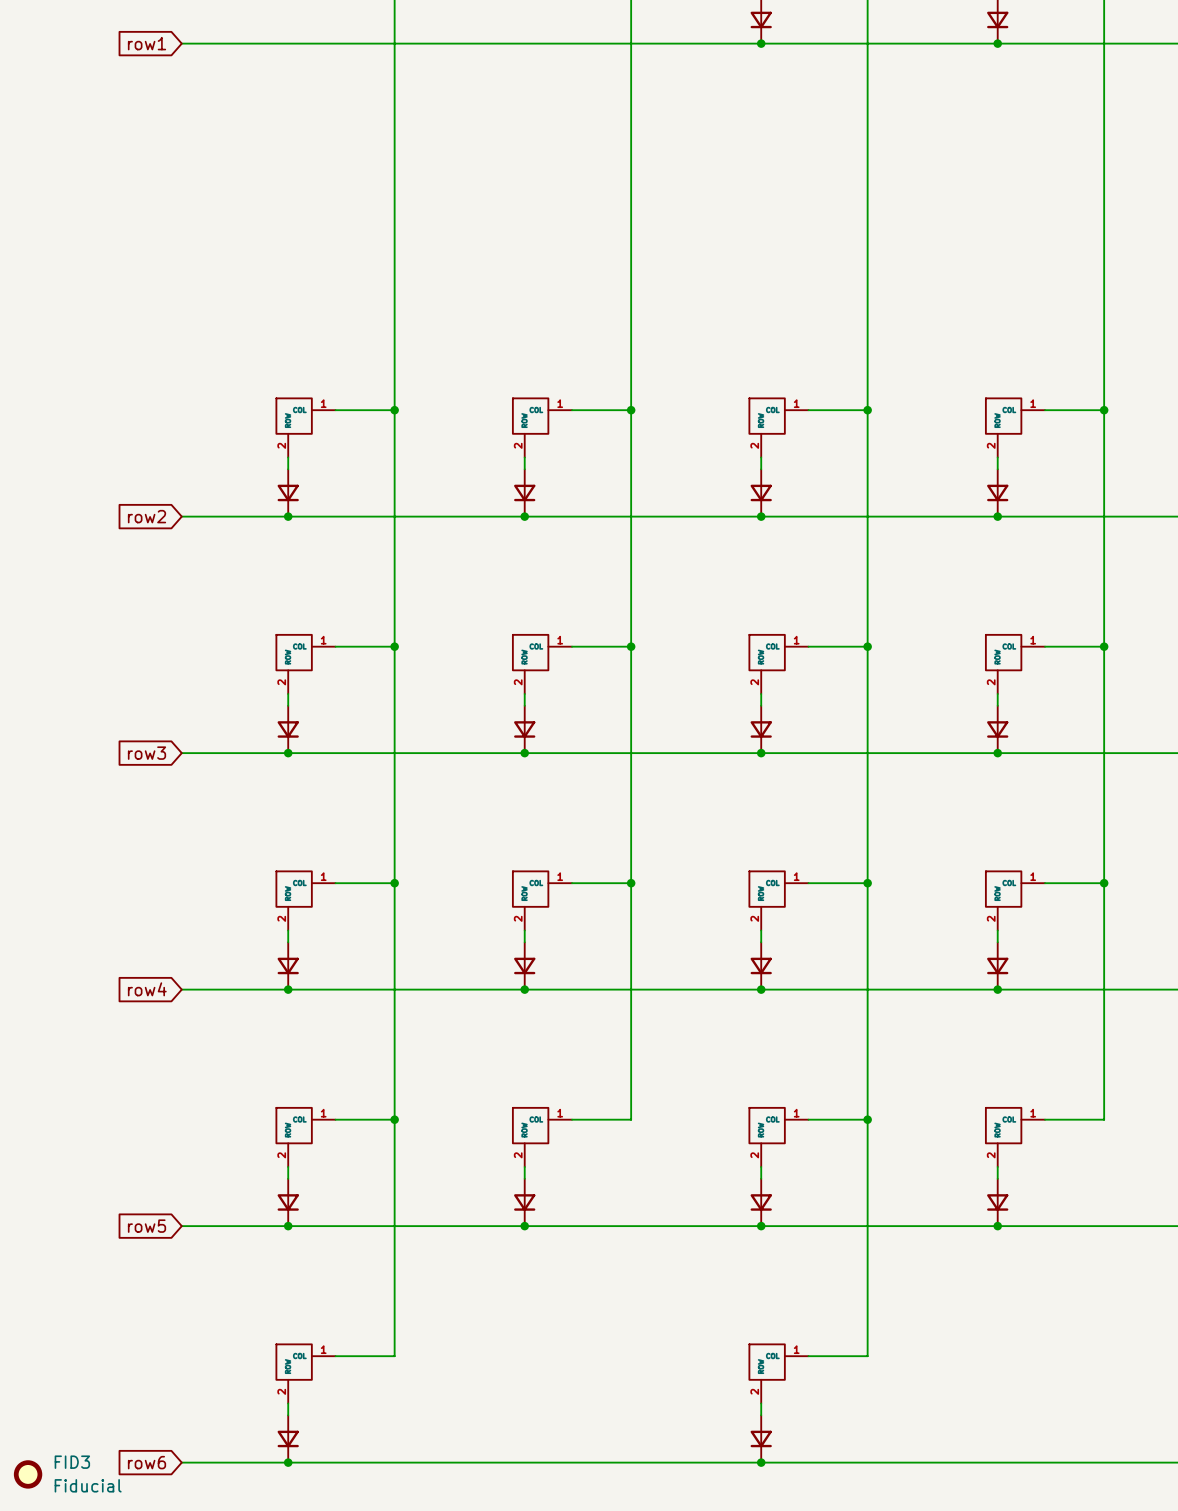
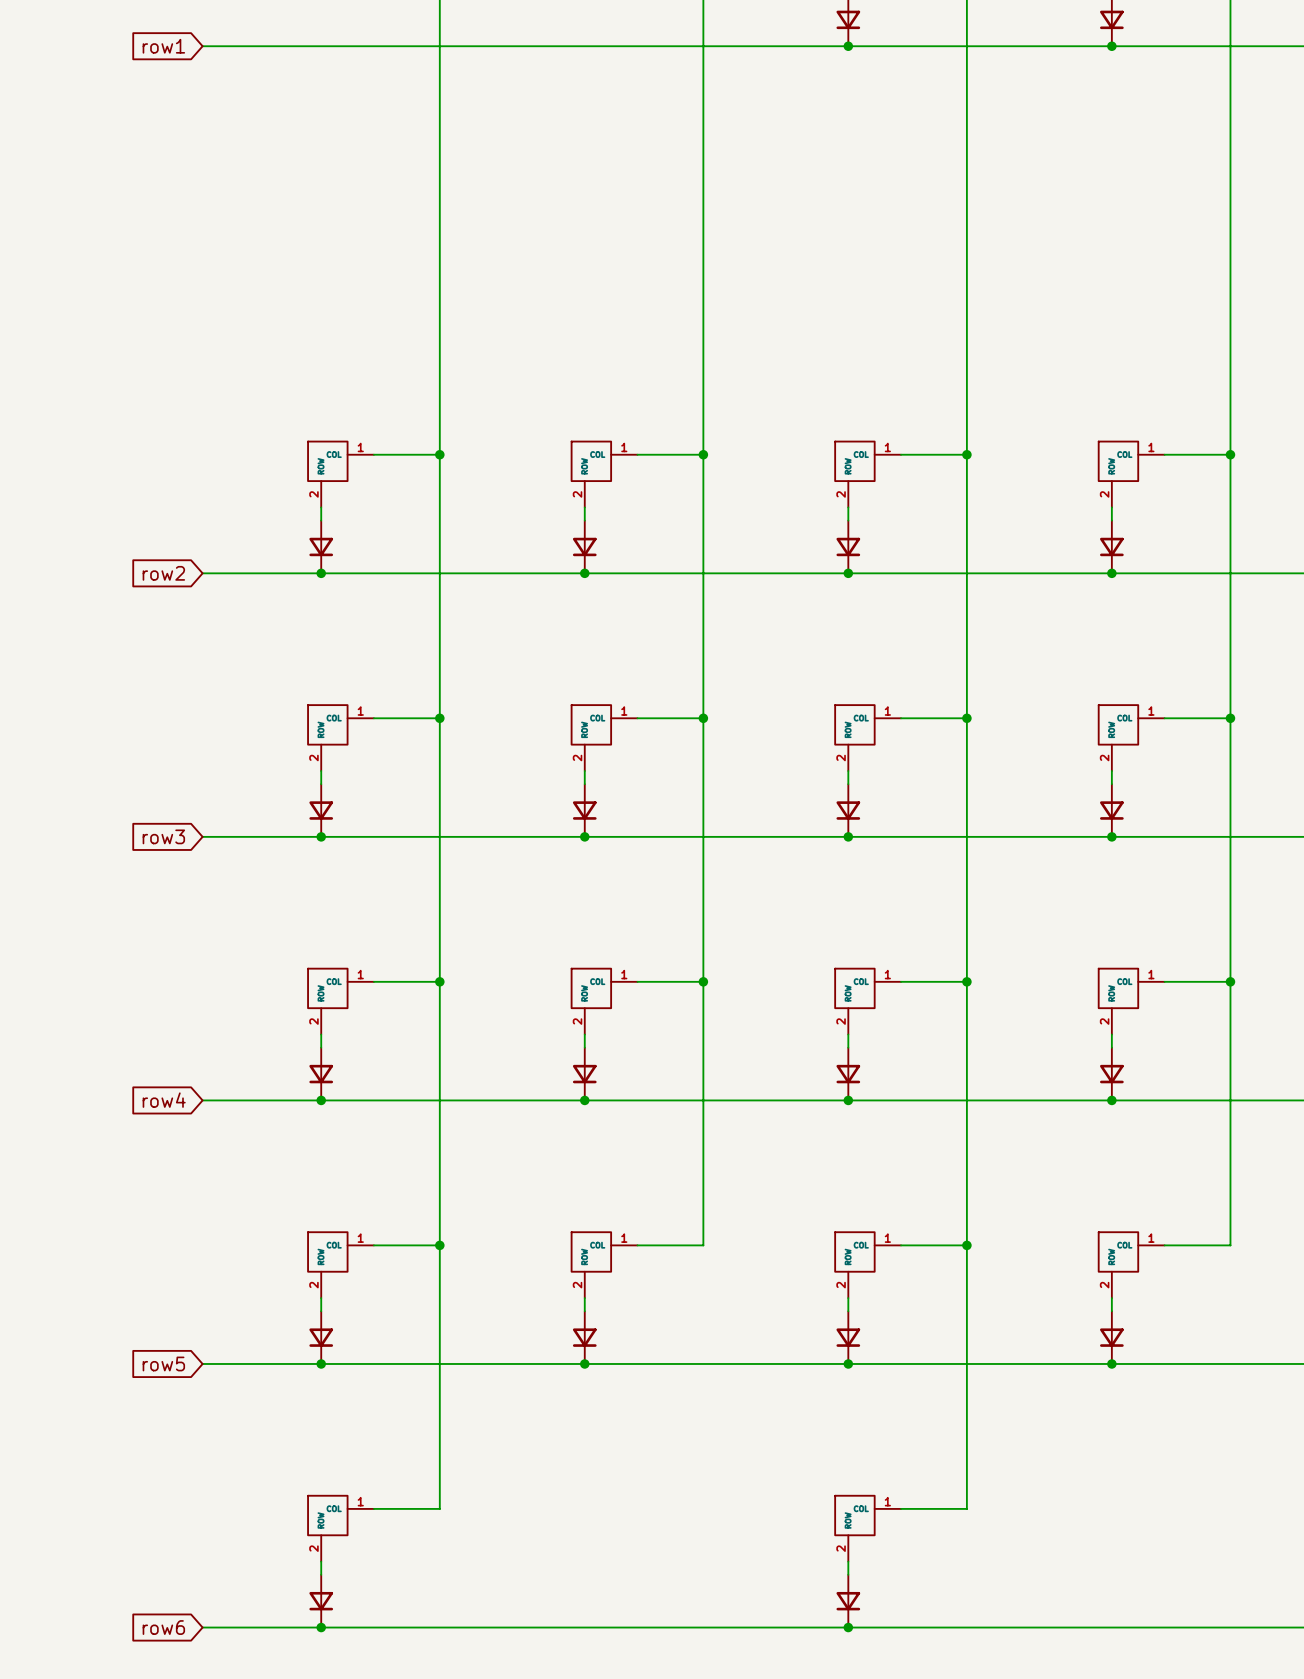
FID3: Fiducial (28, 1474) -> none

